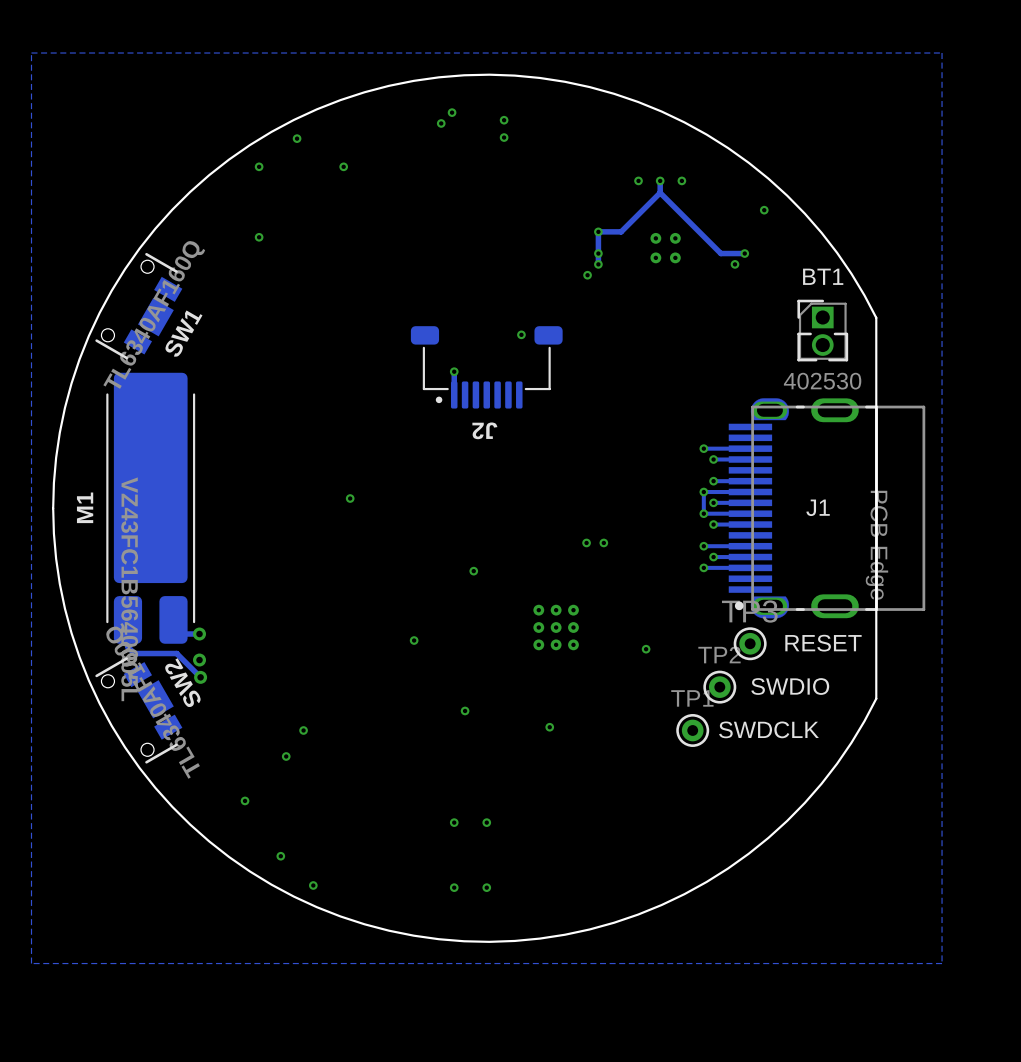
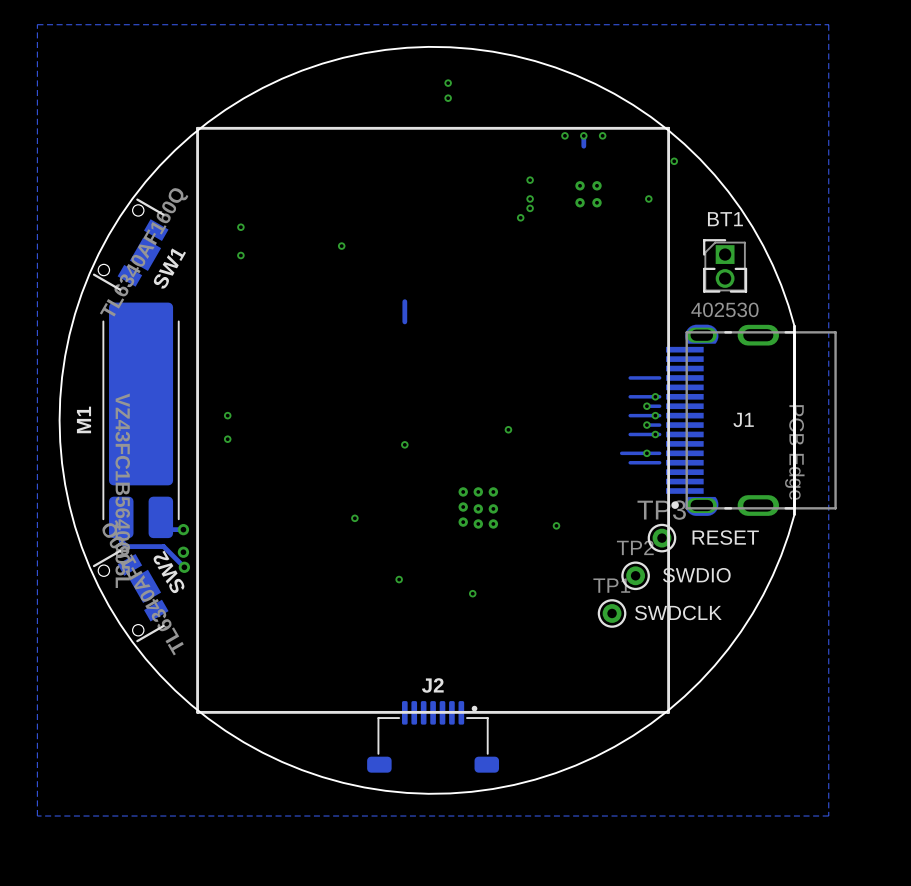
via: (452, 112) -> none
via: (441, 123) -> none
via: (297, 138) -> none
via: (259, 166) -> none
via: (343, 166) -> none
line: none -> (668, 128) (197, 128) (197, 712) (668, 712) (668, 128)
via: (259, 237) -> none
via: none -> (648, 198)
track: (744, 253) (720, 253) (660, 192) (621, 231) (598, 231) (598, 264) -> none
via: (744, 253) -> none
via: (734, 264) -> none
via: none -> (240, 227)
via: none -> (341, 246)
board edge: (876, 317) (876, 698) (837, 763) (787, 820) (728, 868) (684, 894) (614, 922) (565, 934) (514, 940) (438, 939) (389, 930) (340, 916) (271, 884) (209, 841) (172, 806) (139, 768) (99, 703) (79, 657) (64, 608) (53, 533) (53, 482) (59, 432) (79, 359) (111, 290) (155, 228) (209, 175) (249, 145) (293, 119) (364, 92) (438, 77) (489, 74) (540, 77) (614, 93) (661, 111) (706, 134) (768, 178) (804, 213) (837, 252) (876, 317) -> (794, 326) (794, 514) (781, 555) (752, 613) (728, 649) (700, 681) (651, 723) (614, 746) (575, 765) (514, 784) (450, 793) (407, 792) (364, 787) (302, 770) (262, 752) (225, 730) (175, 690) (145, 658) (120, 624) (89, 567) (69, 505) (60, 441) (60, 398) (65, 355) (81, 293) (108, 234) (132, 198) (159, 165) (207, 122) (243, 98) (282, 78) (343, 57) (385, 49) (428, 46) (493, 51) (555, 67) (595, 84) (633, 104) (684, 144) (714, 174) (741, 209) (772, 265) (794, 326)
via: none -> (240, 255)
via: (521, 334) -> none
J2 rotation: 0° (486, 367) -> 180° (433, 736)
J2 position: (486, 367) -> (433, 736)
via: (454, 371) -> none
via: (703, 448) -> none
track: (747, 448) (703, 448) -> none
via: (713, 459) -> none
via: (713, 481) -> none
via: none -> (655, 396)
via: (703, 492) -> none
track: (732, 492) (703, 492) (703, 513) (732, 513) -> none
via: none -> (646, 406)
via: (350, 498) -> none
via: none -> (227, 415)
via: (713, 502) -> none
via: none -> (655, 415)
J1 position: (827, 508) -> (751, 420)
via: (703, 513) -> none
via: none -> (646, 425)
via: none -> (508, 429)
via: (713, 524) -> none
via: none -> (655, 434)
via: none -> (227, 439)
via: (586, 542) -> none
via: (603, 542) -> none
via: (703, 546) -> none
via: none -> (646, 453)
via: (713, 557) -> none
via: (703, 567) -> none
track: (747, 567) (703, 567) -> none
via position: (473, 571) -> (404, 444)
via: none -> (463, 491)
via: none -> (478, 491)
via: none -> (493, 491)
via: none -> (463, 507)
via: (573, 610) -> none
via: none -> (463, 522)
via: (573, 627) -> none
via position: (414, 640) -> (354, 518)
via: (538, 644) -> none
via: (556, 644) -> none
via: (573, 644) -> none
via position: (646, 649) -> (556, 525)
via position: (465, 710) -> (399, 579)
via position: (549, 727) -> (472, 593)
via: (303, 730) -> none
via: (286, 756) -> none
via: (245, 800) -> none
via: (454, 822) -> none
via: (486, 822) -> none
via: (280, 856) -> none
via: (313, 885) -> none
via: (454, 887) -> none
via: (486, 887) -> none

